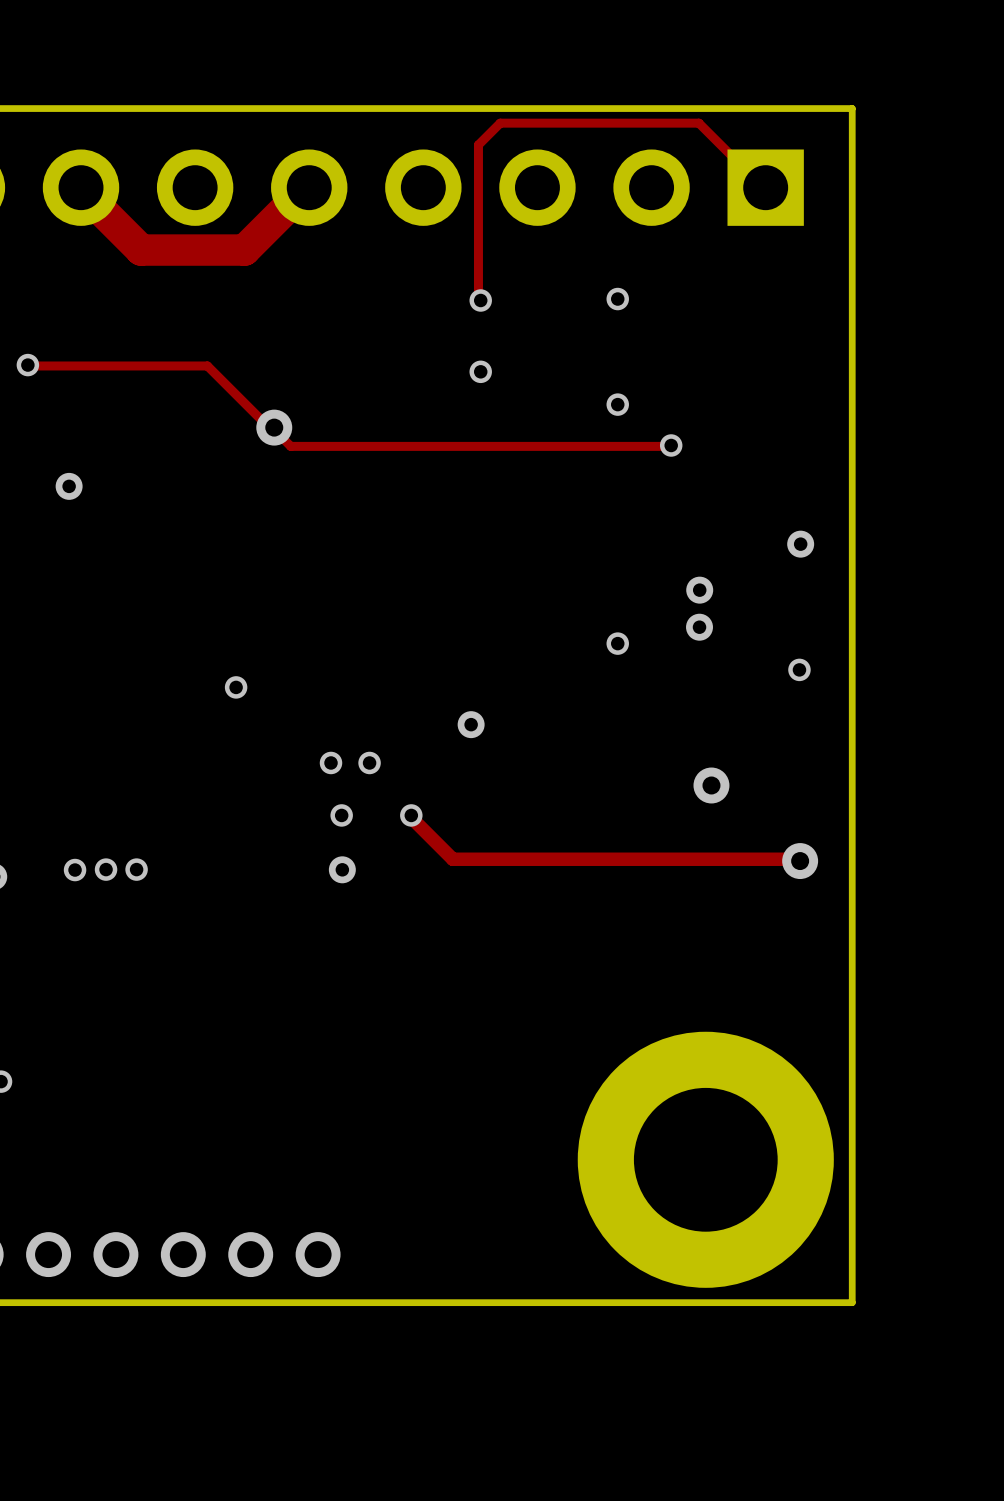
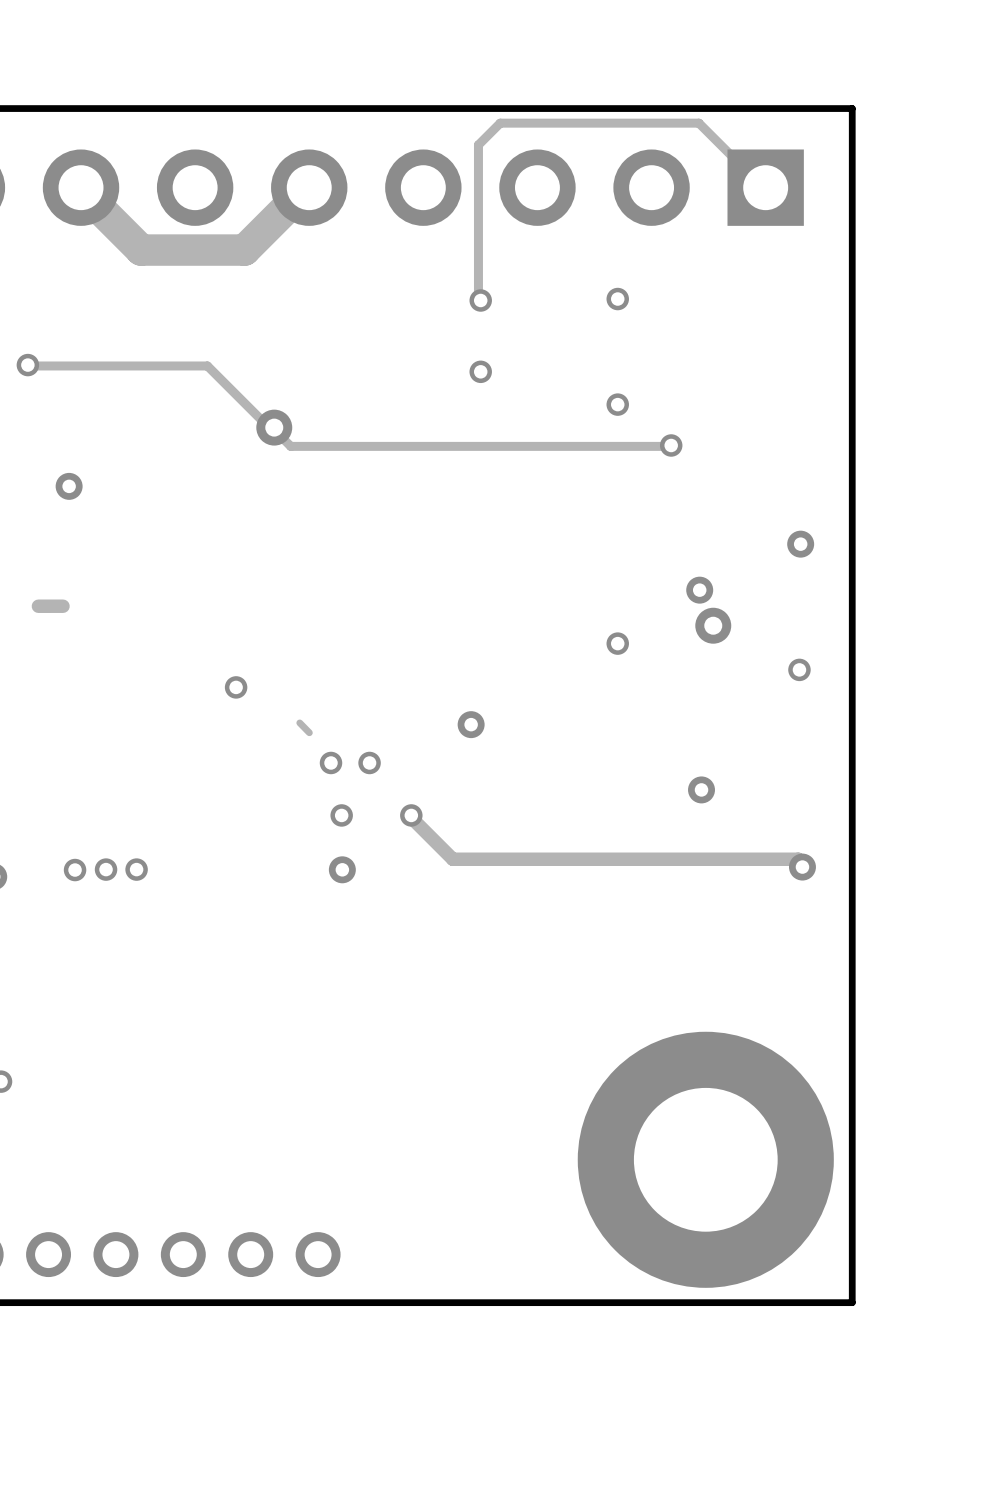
track: none -> (38, 606) (62, 606)
via size: [686, 613, 713, 641] -> [695, 607, 732, 644]
track: none -> (299, 722) (309, 732)
via size: [693, 767, 730, 804] -> [688, 776, 715, 804]
via size: [782, 843, 819, 880] -> [788, 853, 816, 881]

